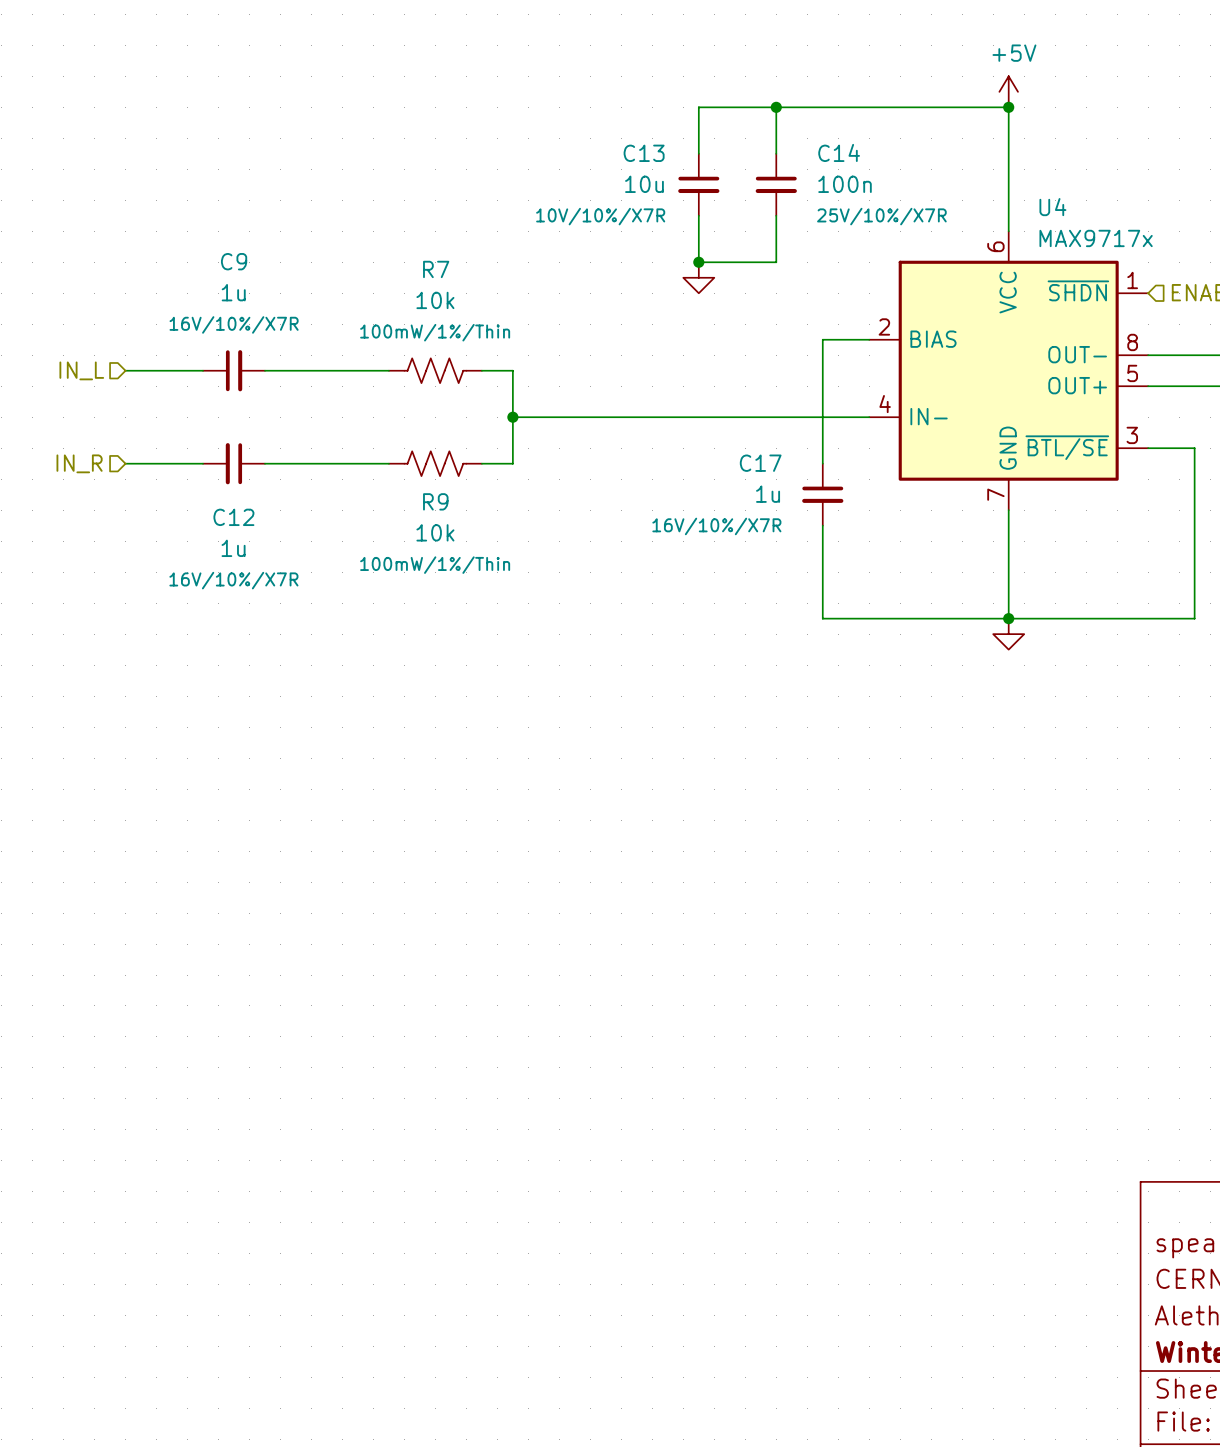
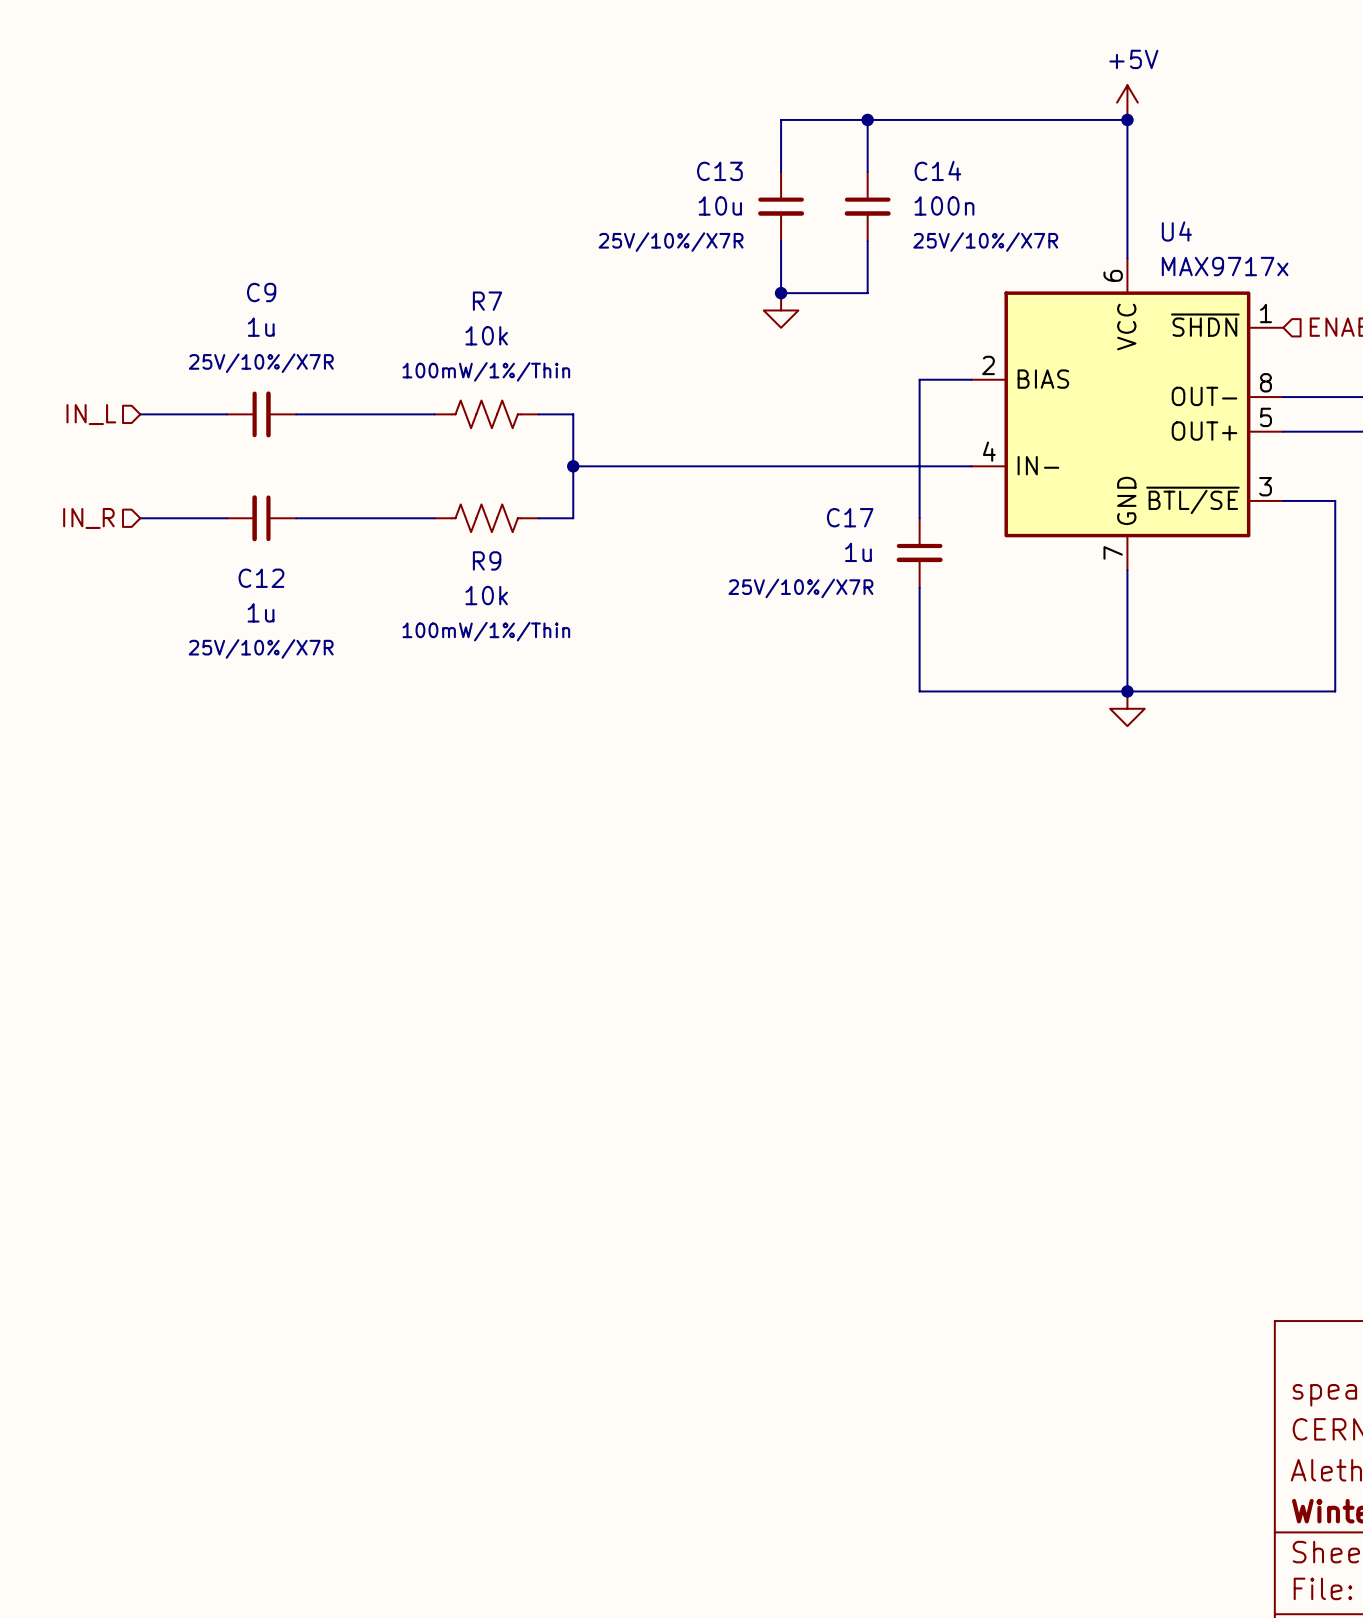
C13 text: 10V/10%/X7R (600, 216) -> 25V/10%/X7R (671, 242)
C9 text: 16V/10%/X7R (234, 324) -> 25V/10%/X7R (261, 363)
C17 text: 16V/10%/X7R (716, 526) -> 25V/10%/X7R (800, 588)
C12 text: 16V/10%/X7R (233, 580) -> 25V/10%/X7R (261, 648)

